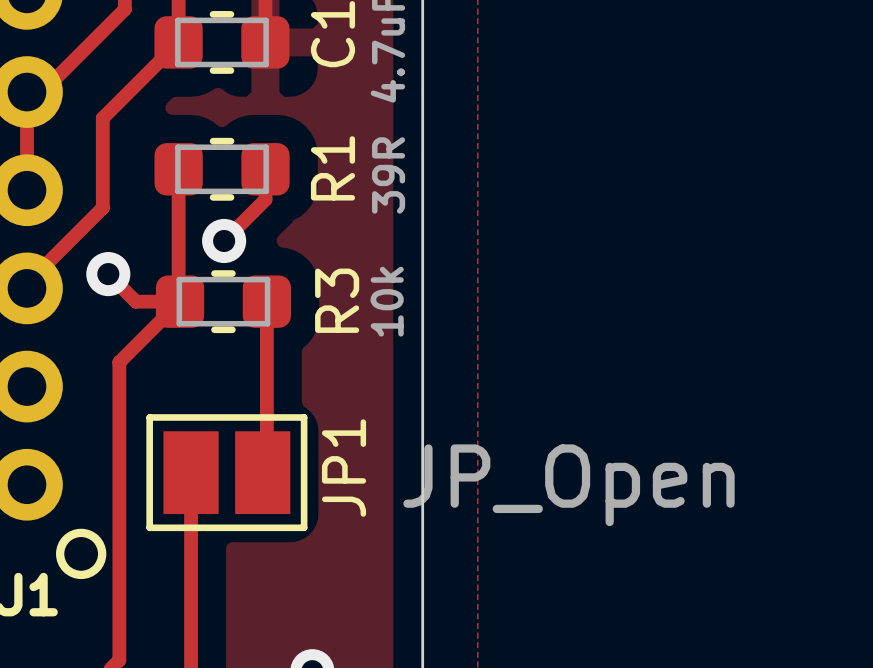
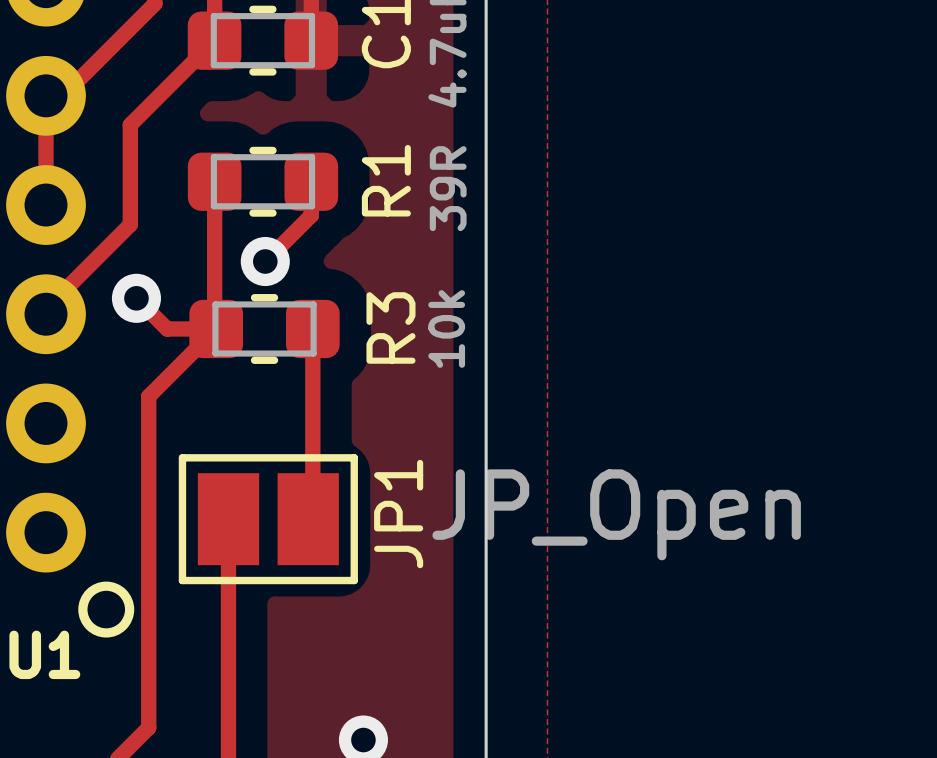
JP1 value position: JP_Open (568, 485) -> JP_Open (616, 514)

